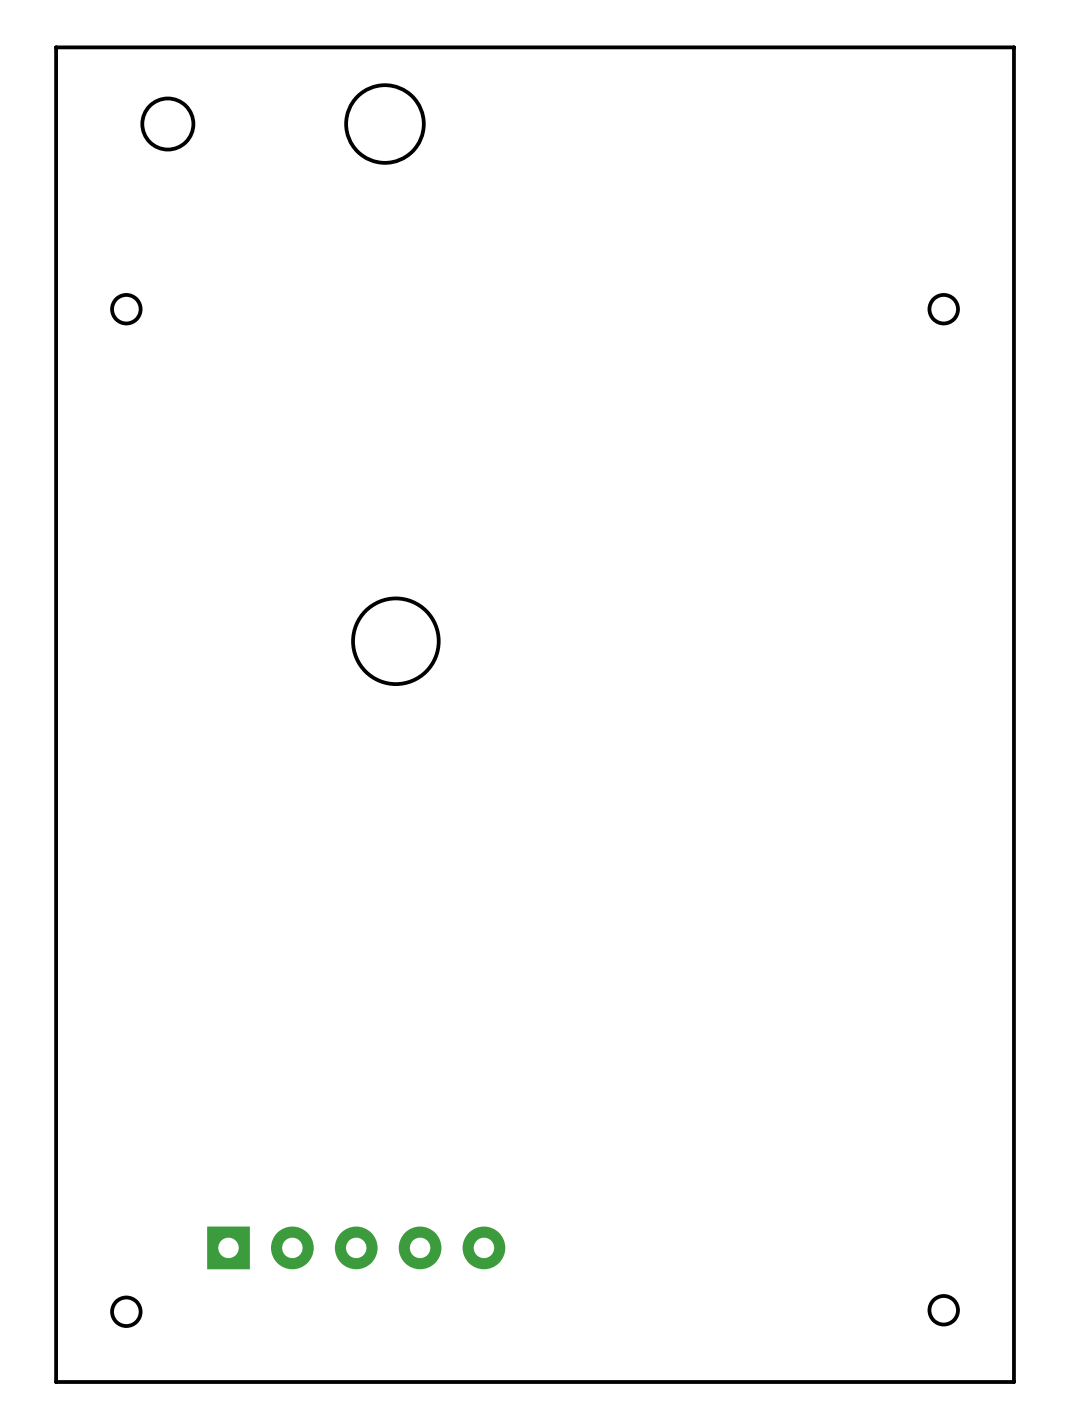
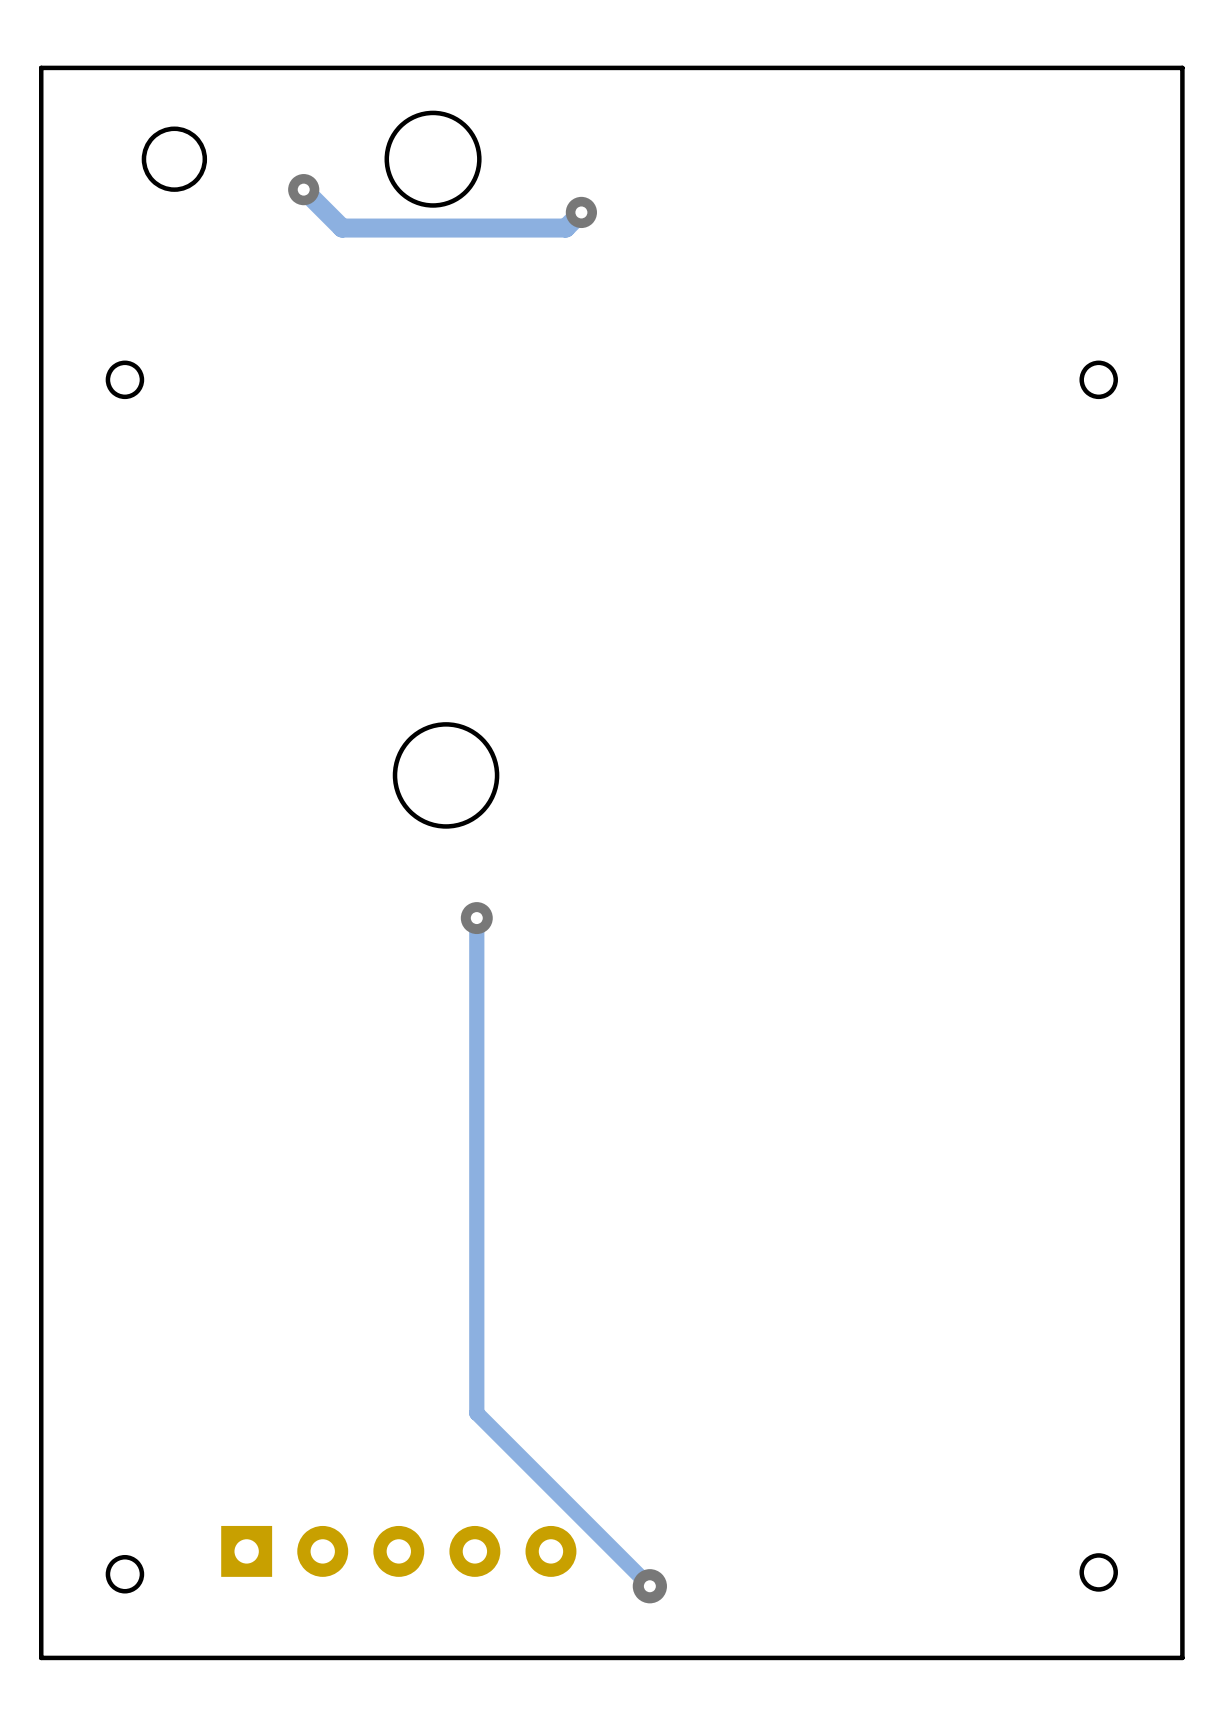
track: none -> (303, 189) (342, 228) (565, 228) (581, 212)
via: none -> (303, 189)
via: none -> (581, 212)
via: none -> (476, 918)
track: none -> (476, 930) (476, 1413) (649, 1586)
part position: (356, 1247) -> (398, 1551)
via: none -> (649, 1586)

